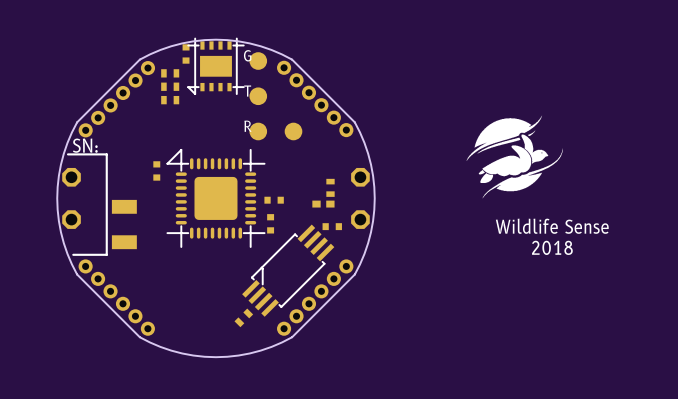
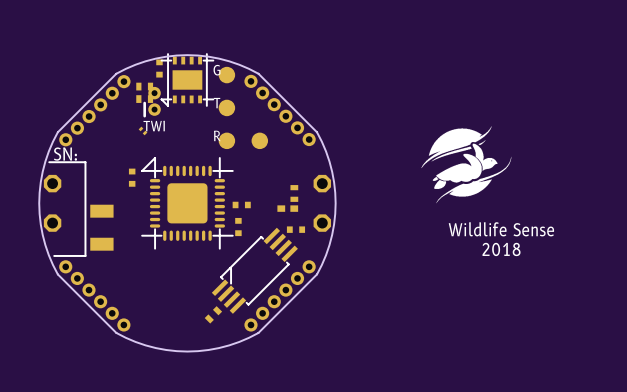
TWI: none -> (152, 102)
part: (170, 100) -> none
part: none -> (143, 130)

